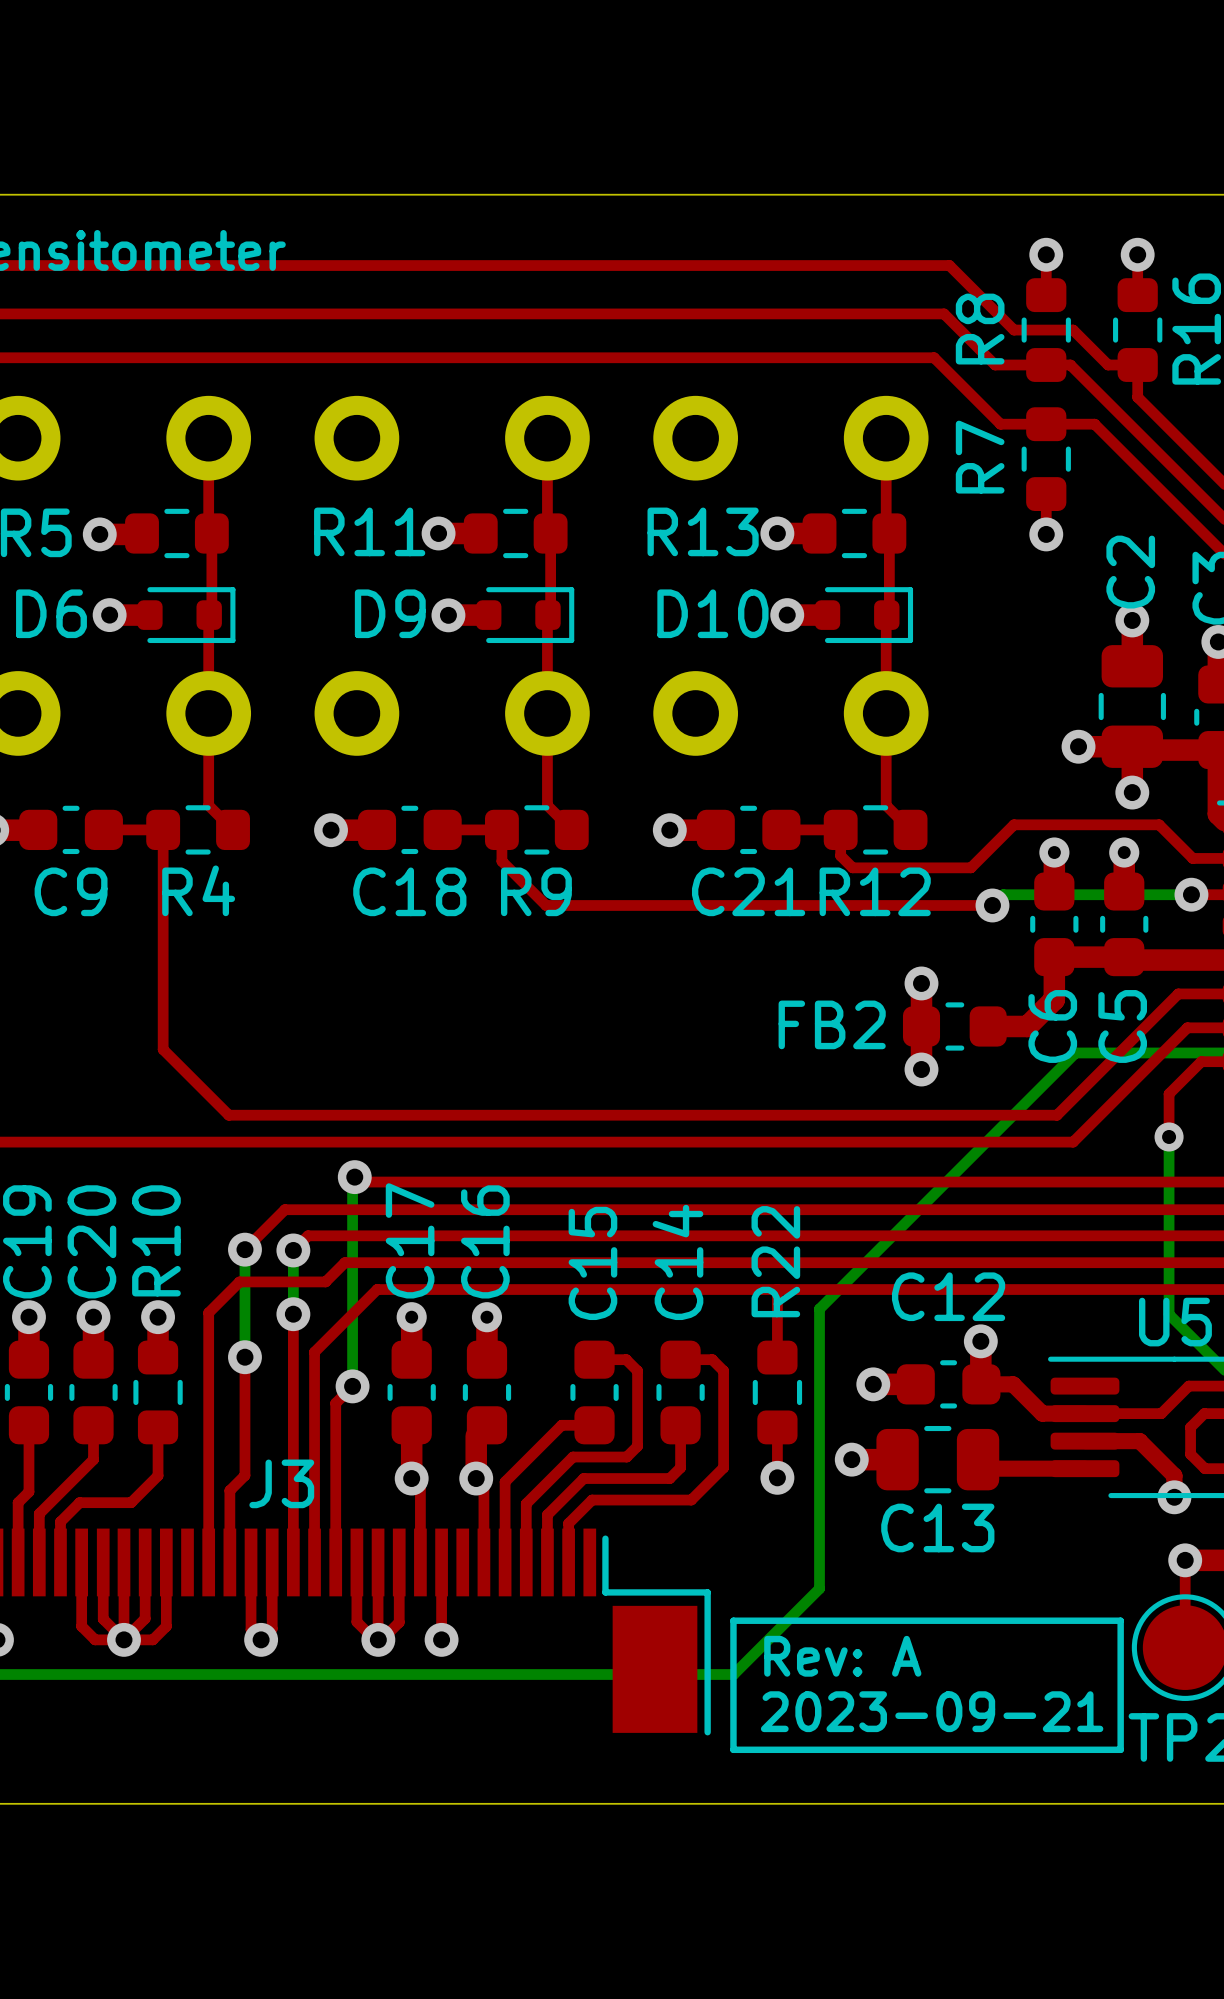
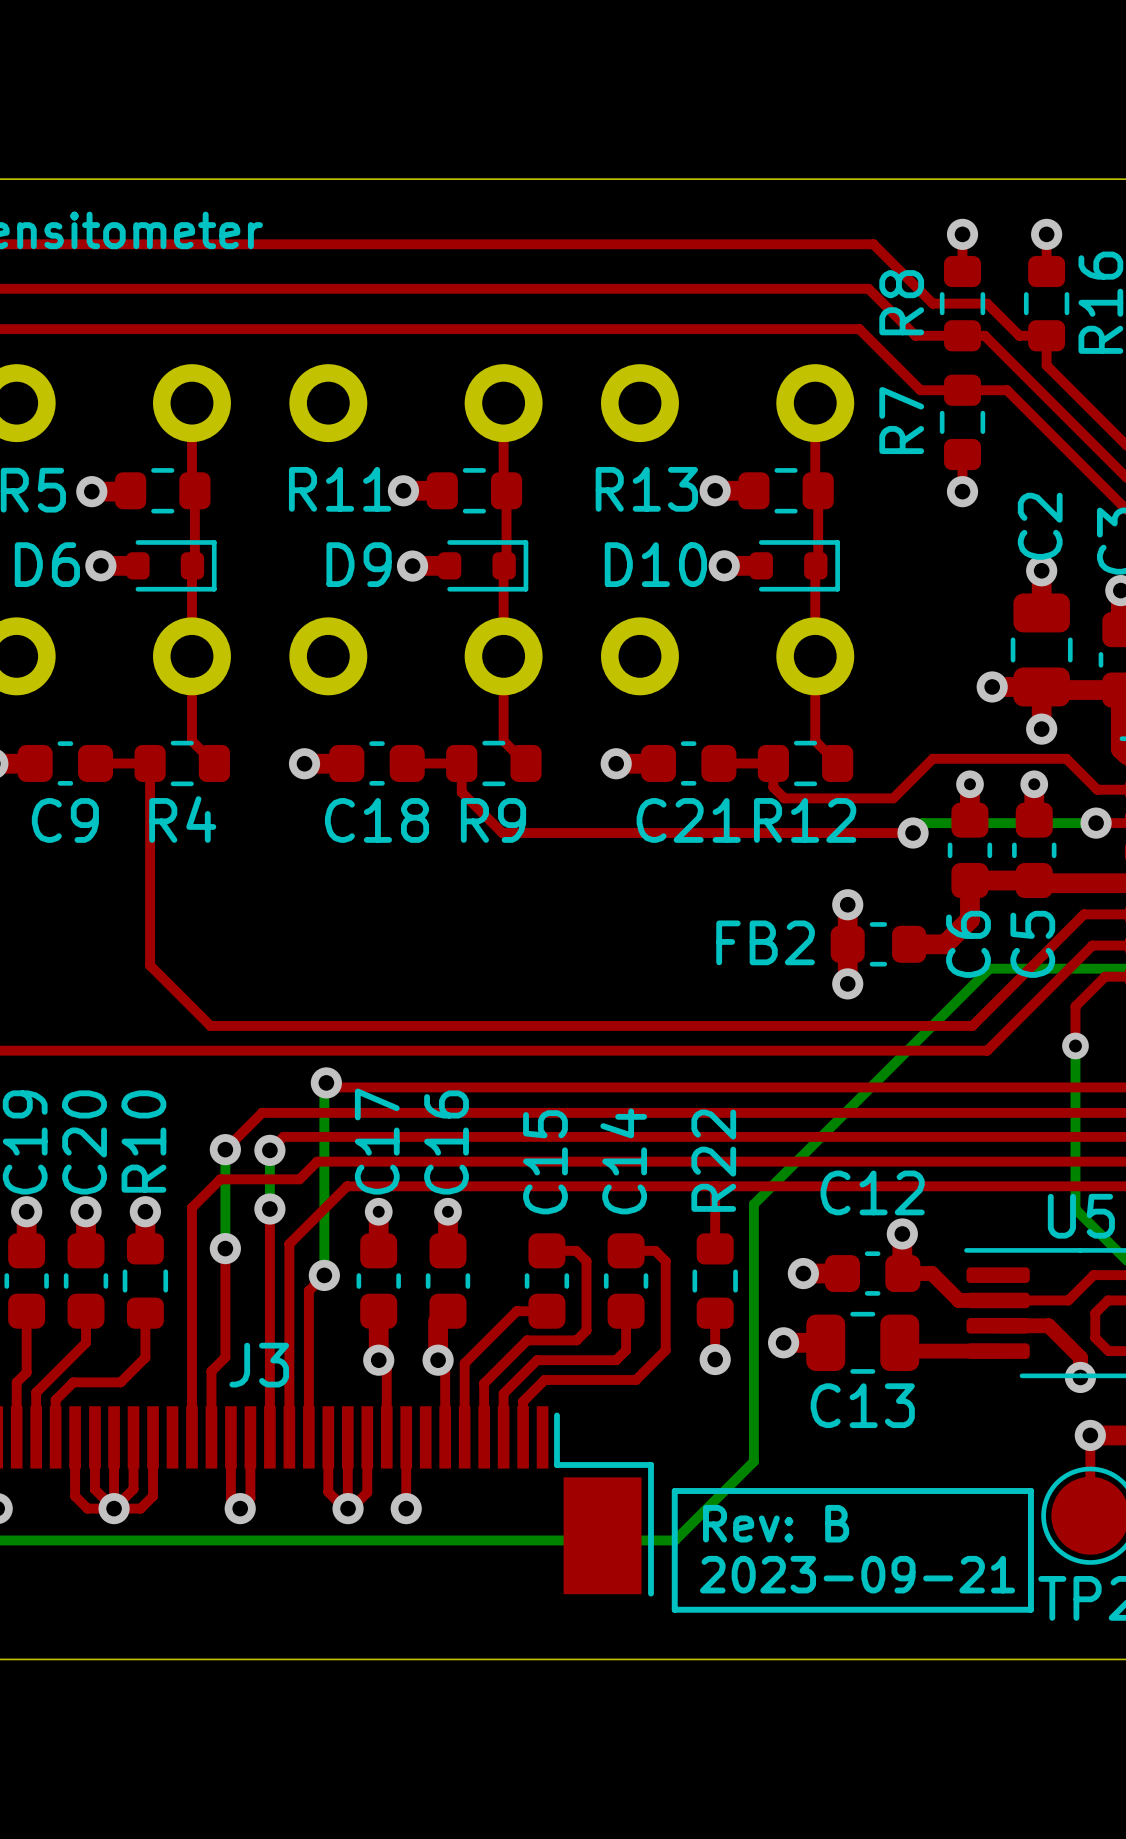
text: Rev: A (842, 1656) -> Rev: B (776, 1523)

